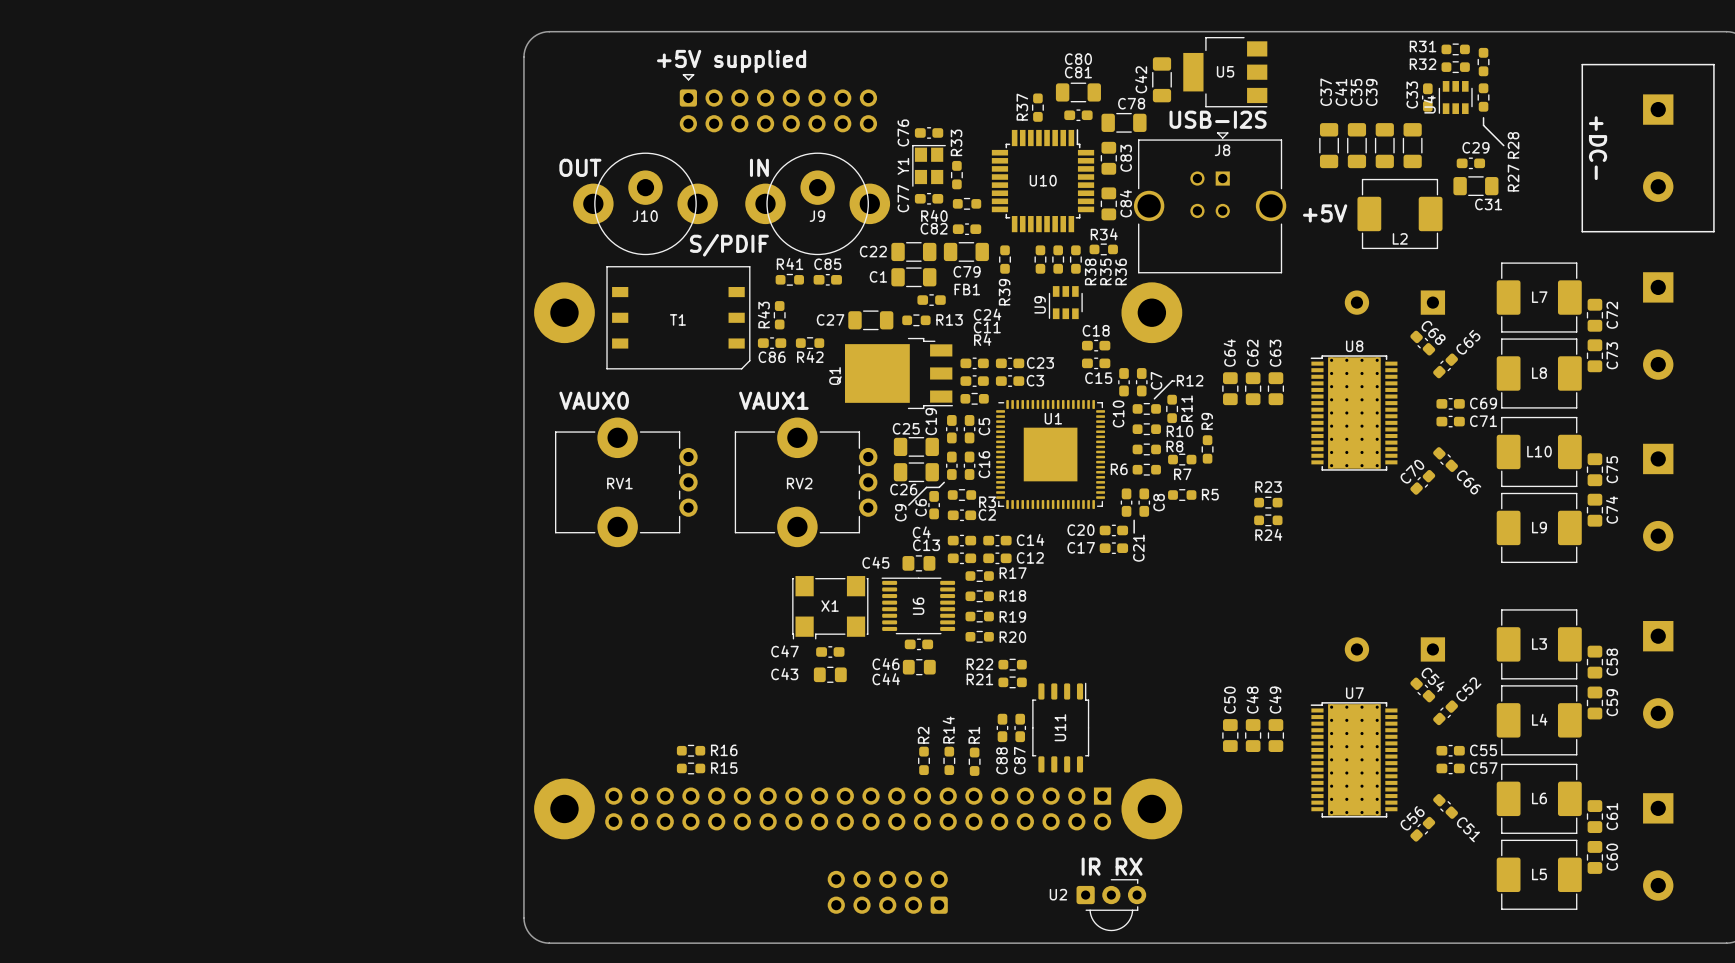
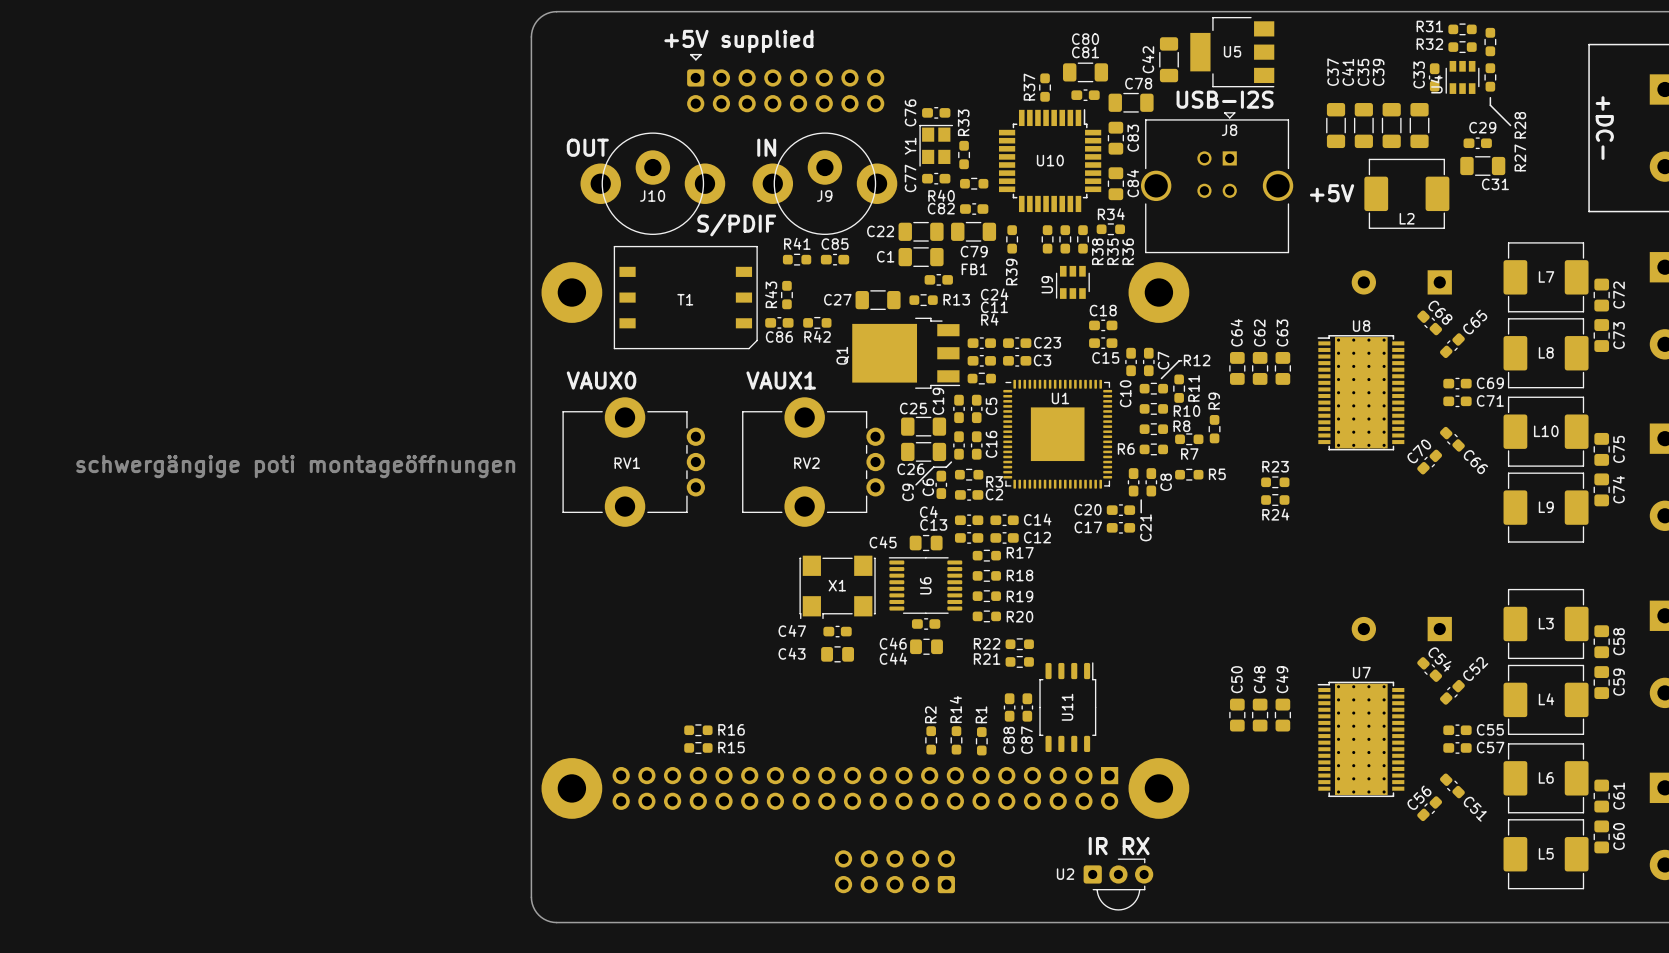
text: none -> schwergängige poti montageöffnungen (295, 466)

